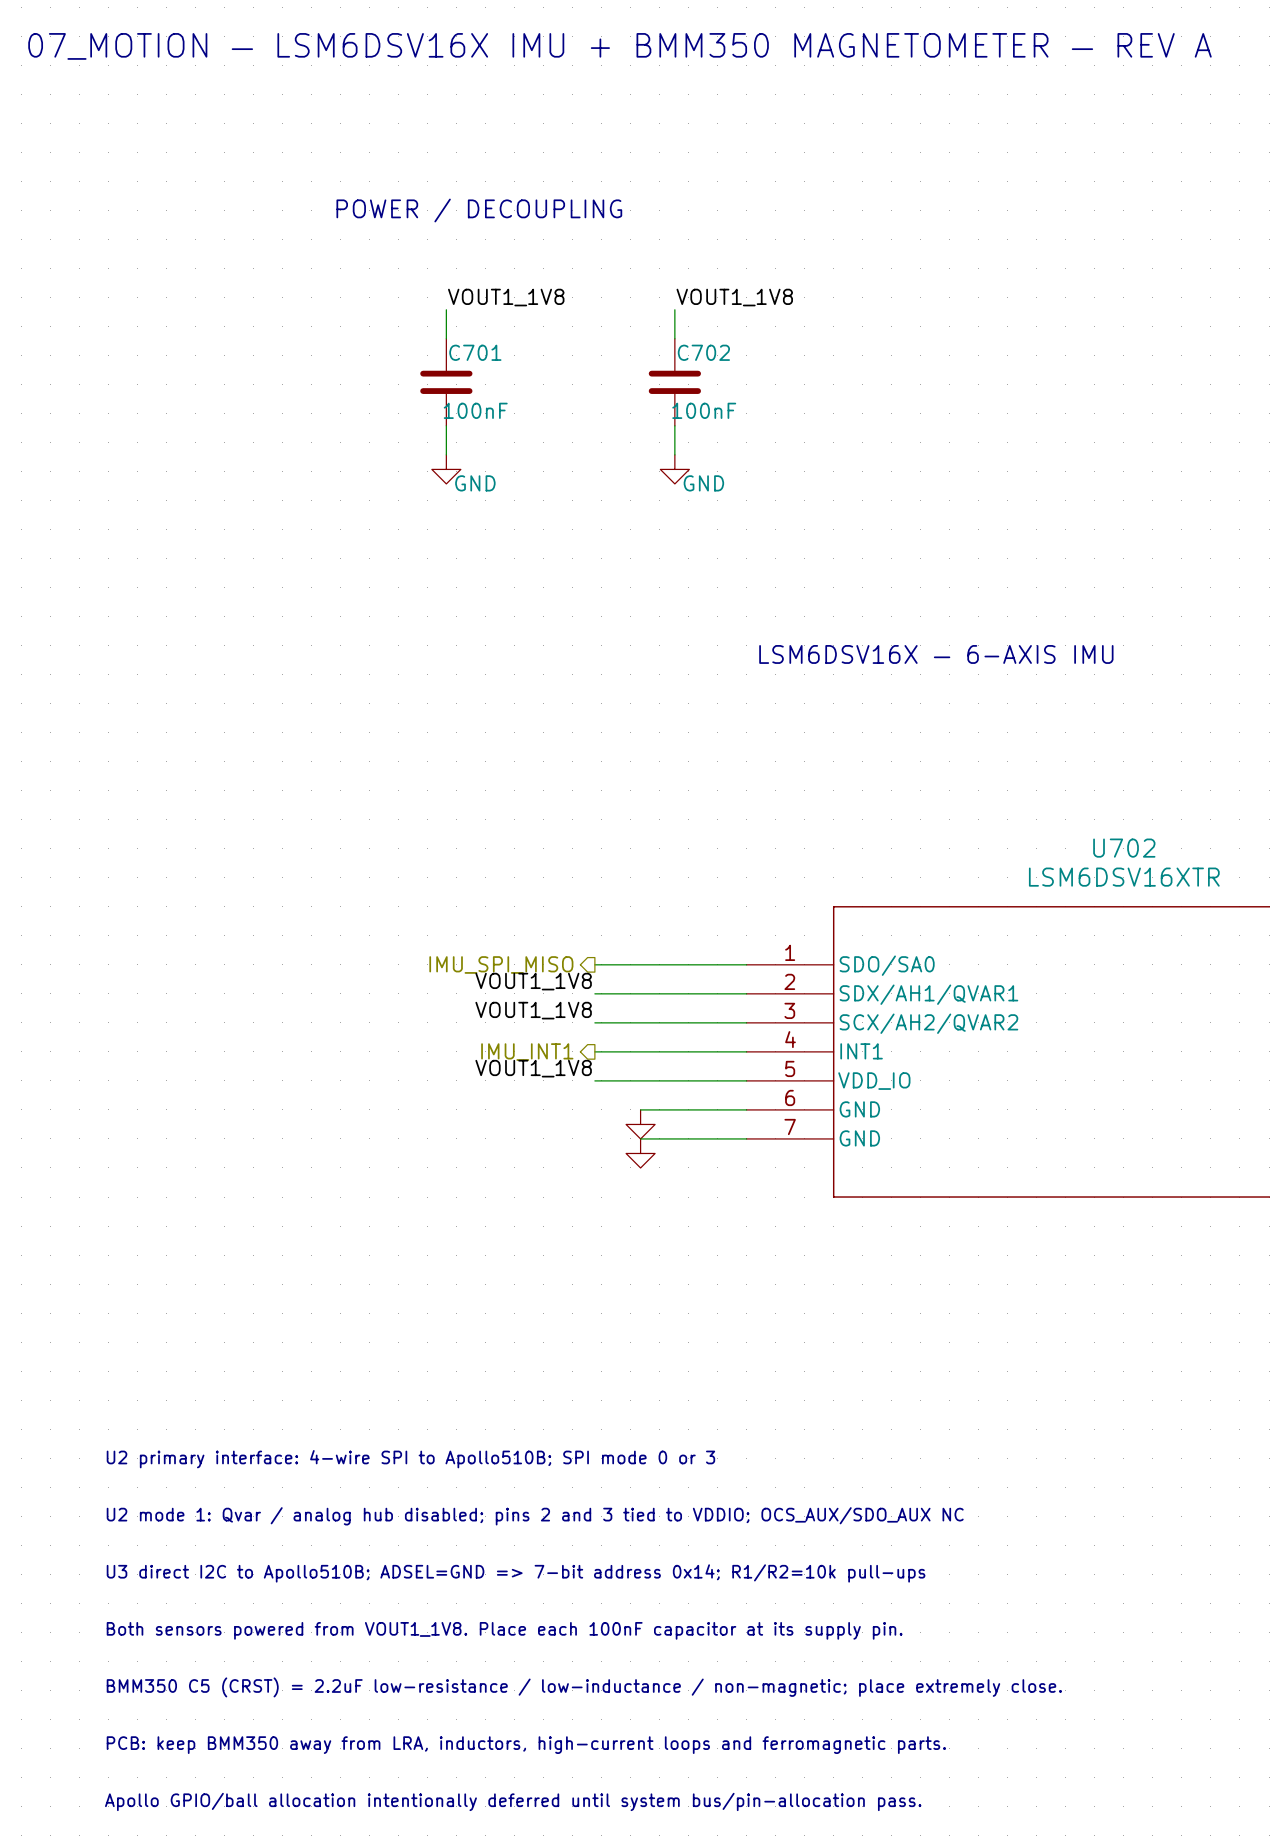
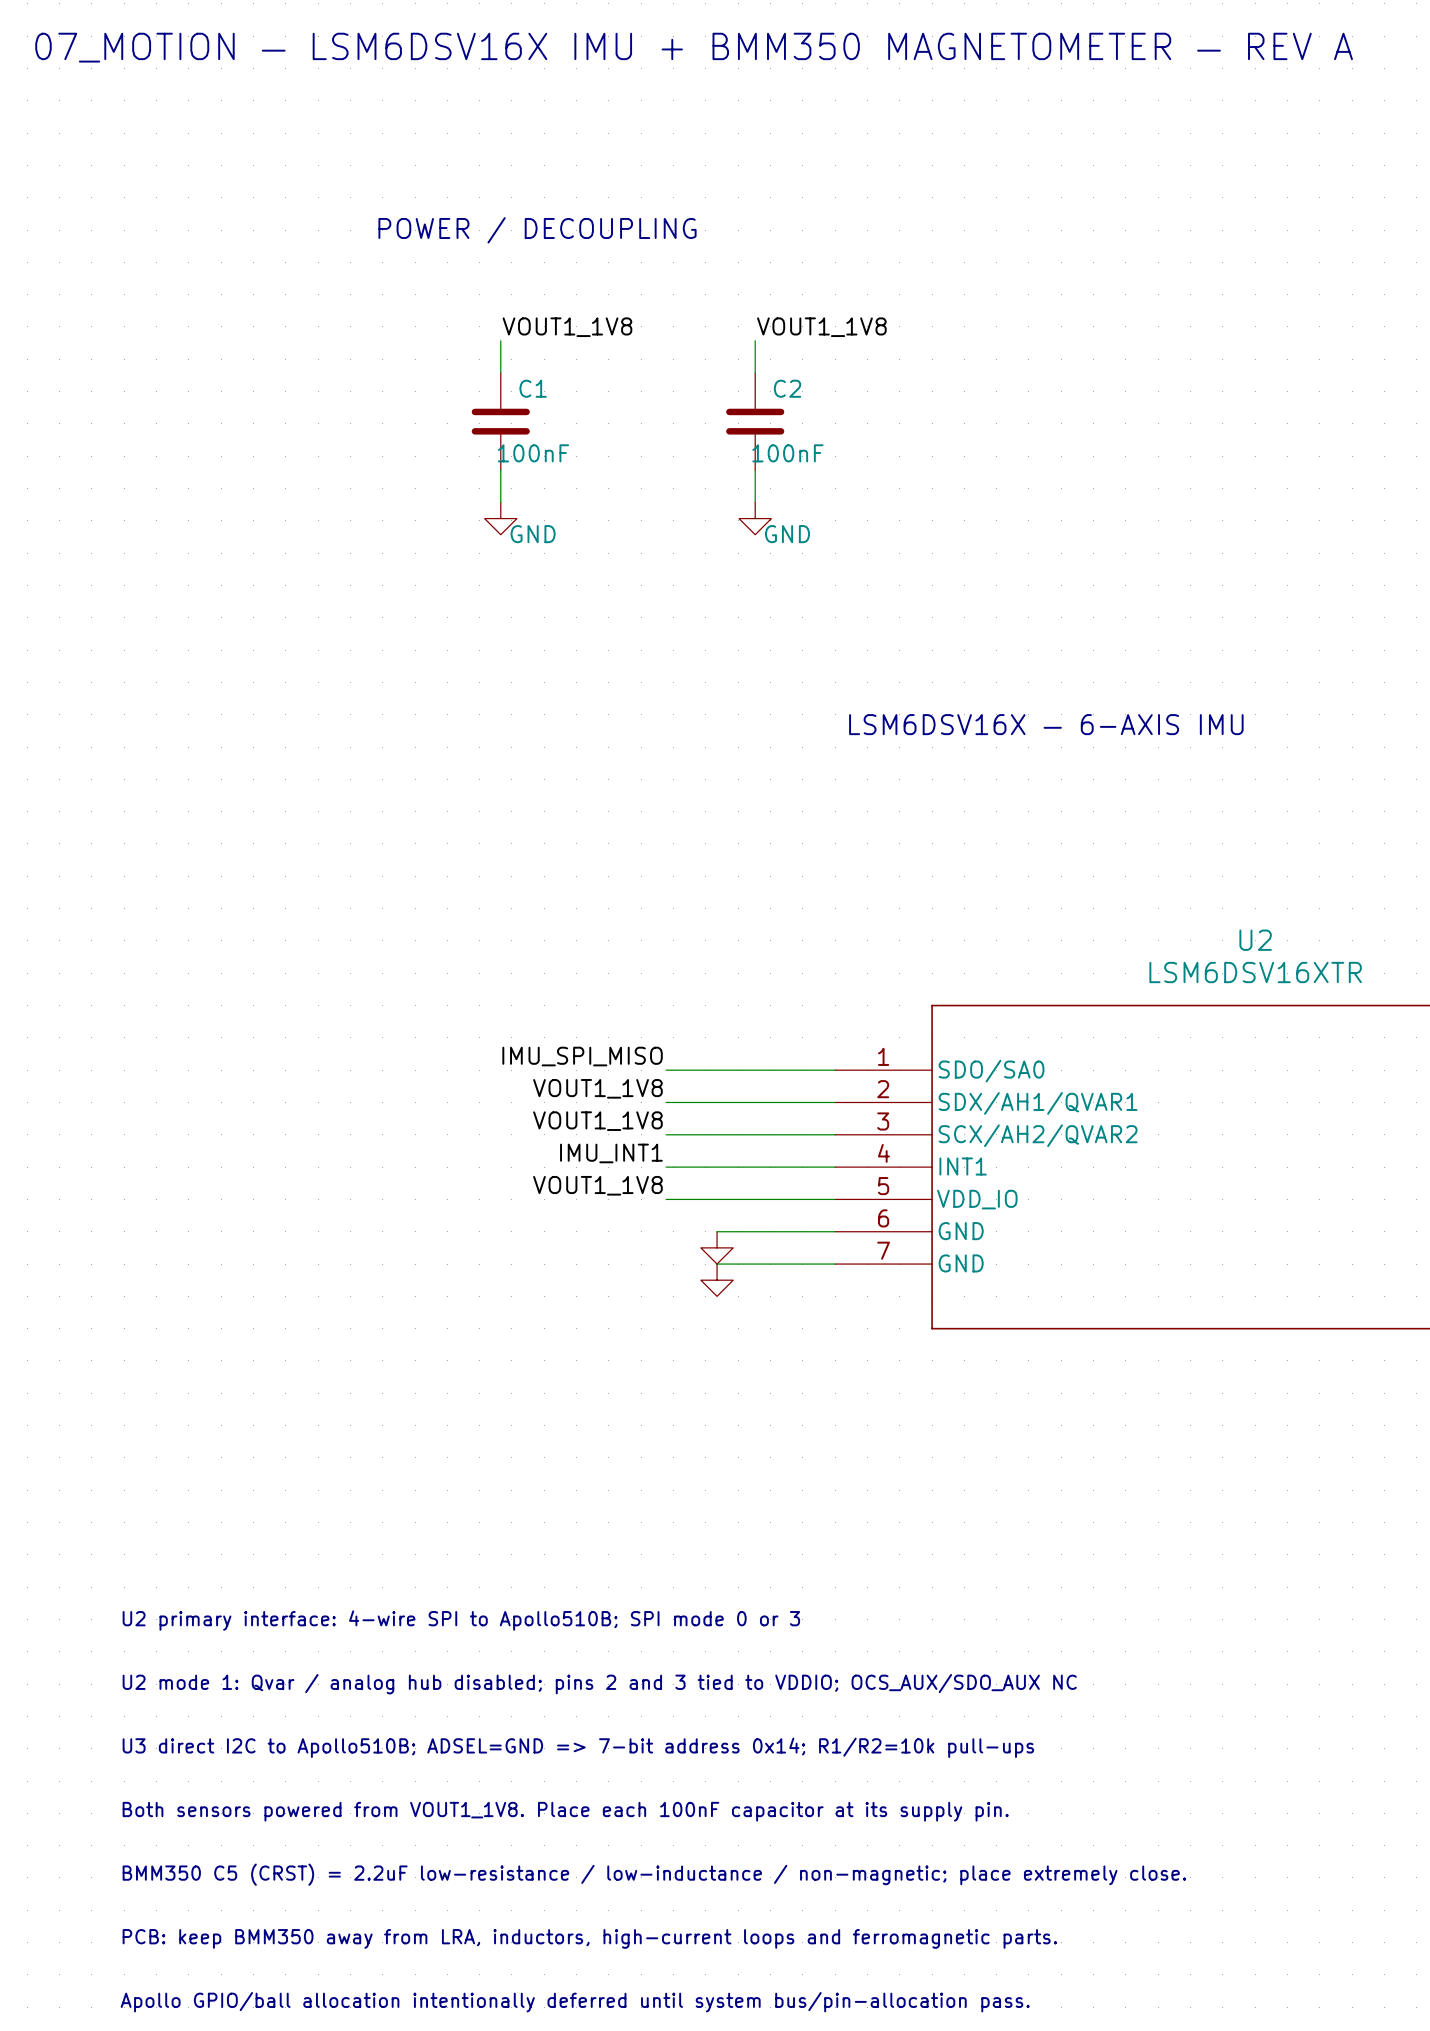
C701 name: C701 (475, 352) -> C1 (533, 388)
C702 name: C702 (703, 352) -> C2 (787, 388)
U702 name: U702 (1124, 848) -> U2 (1255, 940)
label: none -> IMU_SPI_MISO (582, 1056)
hierarchical label: IMU_SPI_MISO (501, 964) -> none
label: none -> IMU_INT1 (611, 1153)
hierarchical label: IMU_INT1 (527, 1052) -> none

